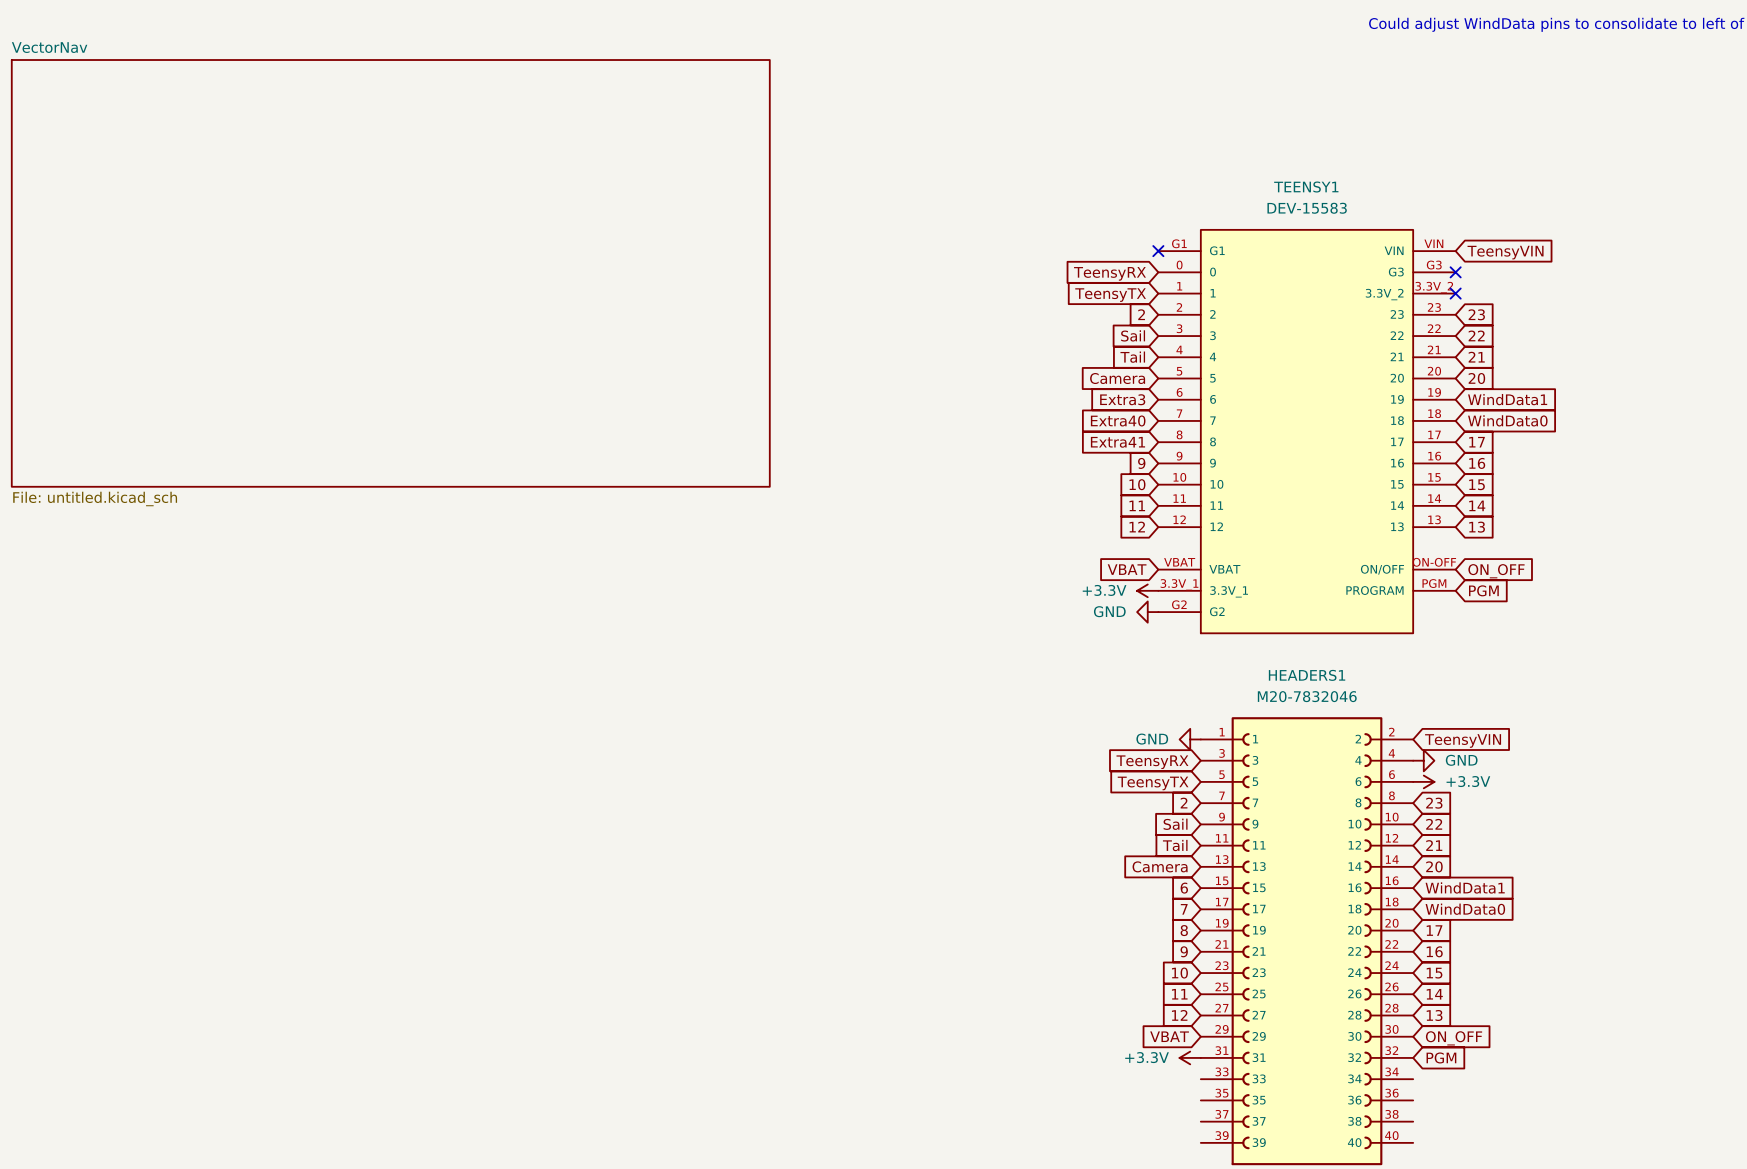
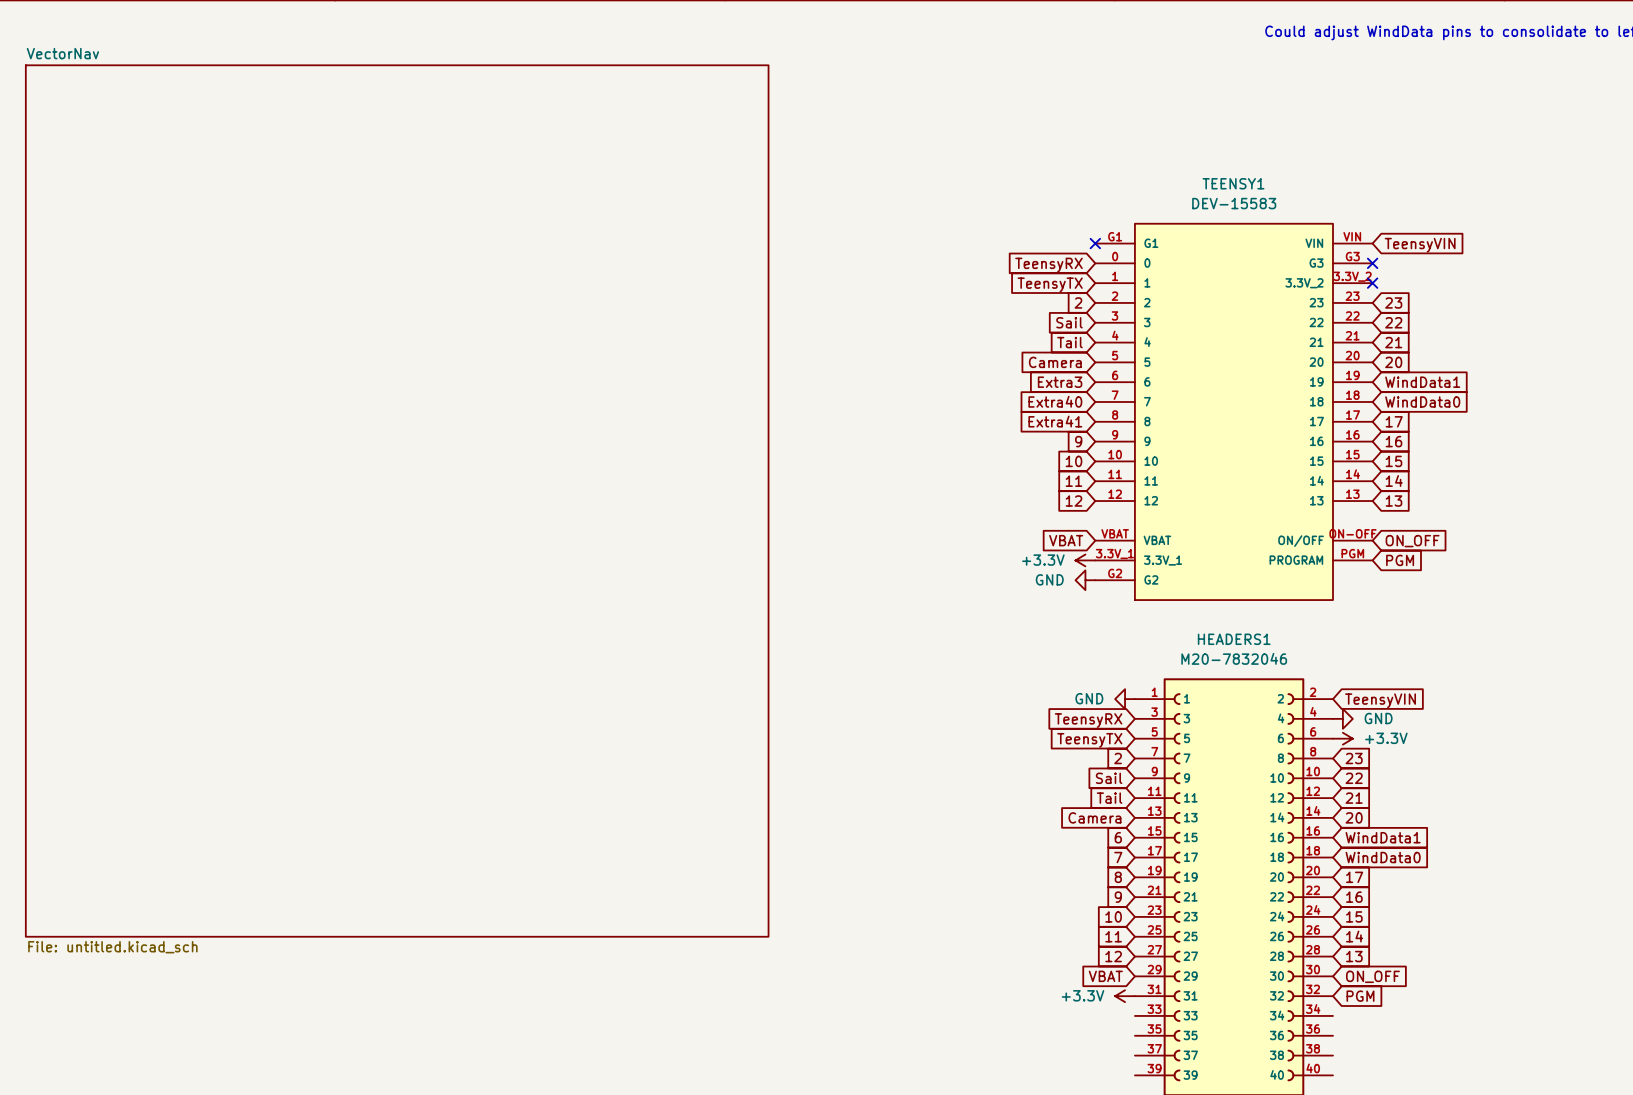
sheet VectorNav: File: untitled.kicad_sch (390, 273) -> none
sheet VectorNav: none -> File: untitled.kicad_sch (397, 501)

